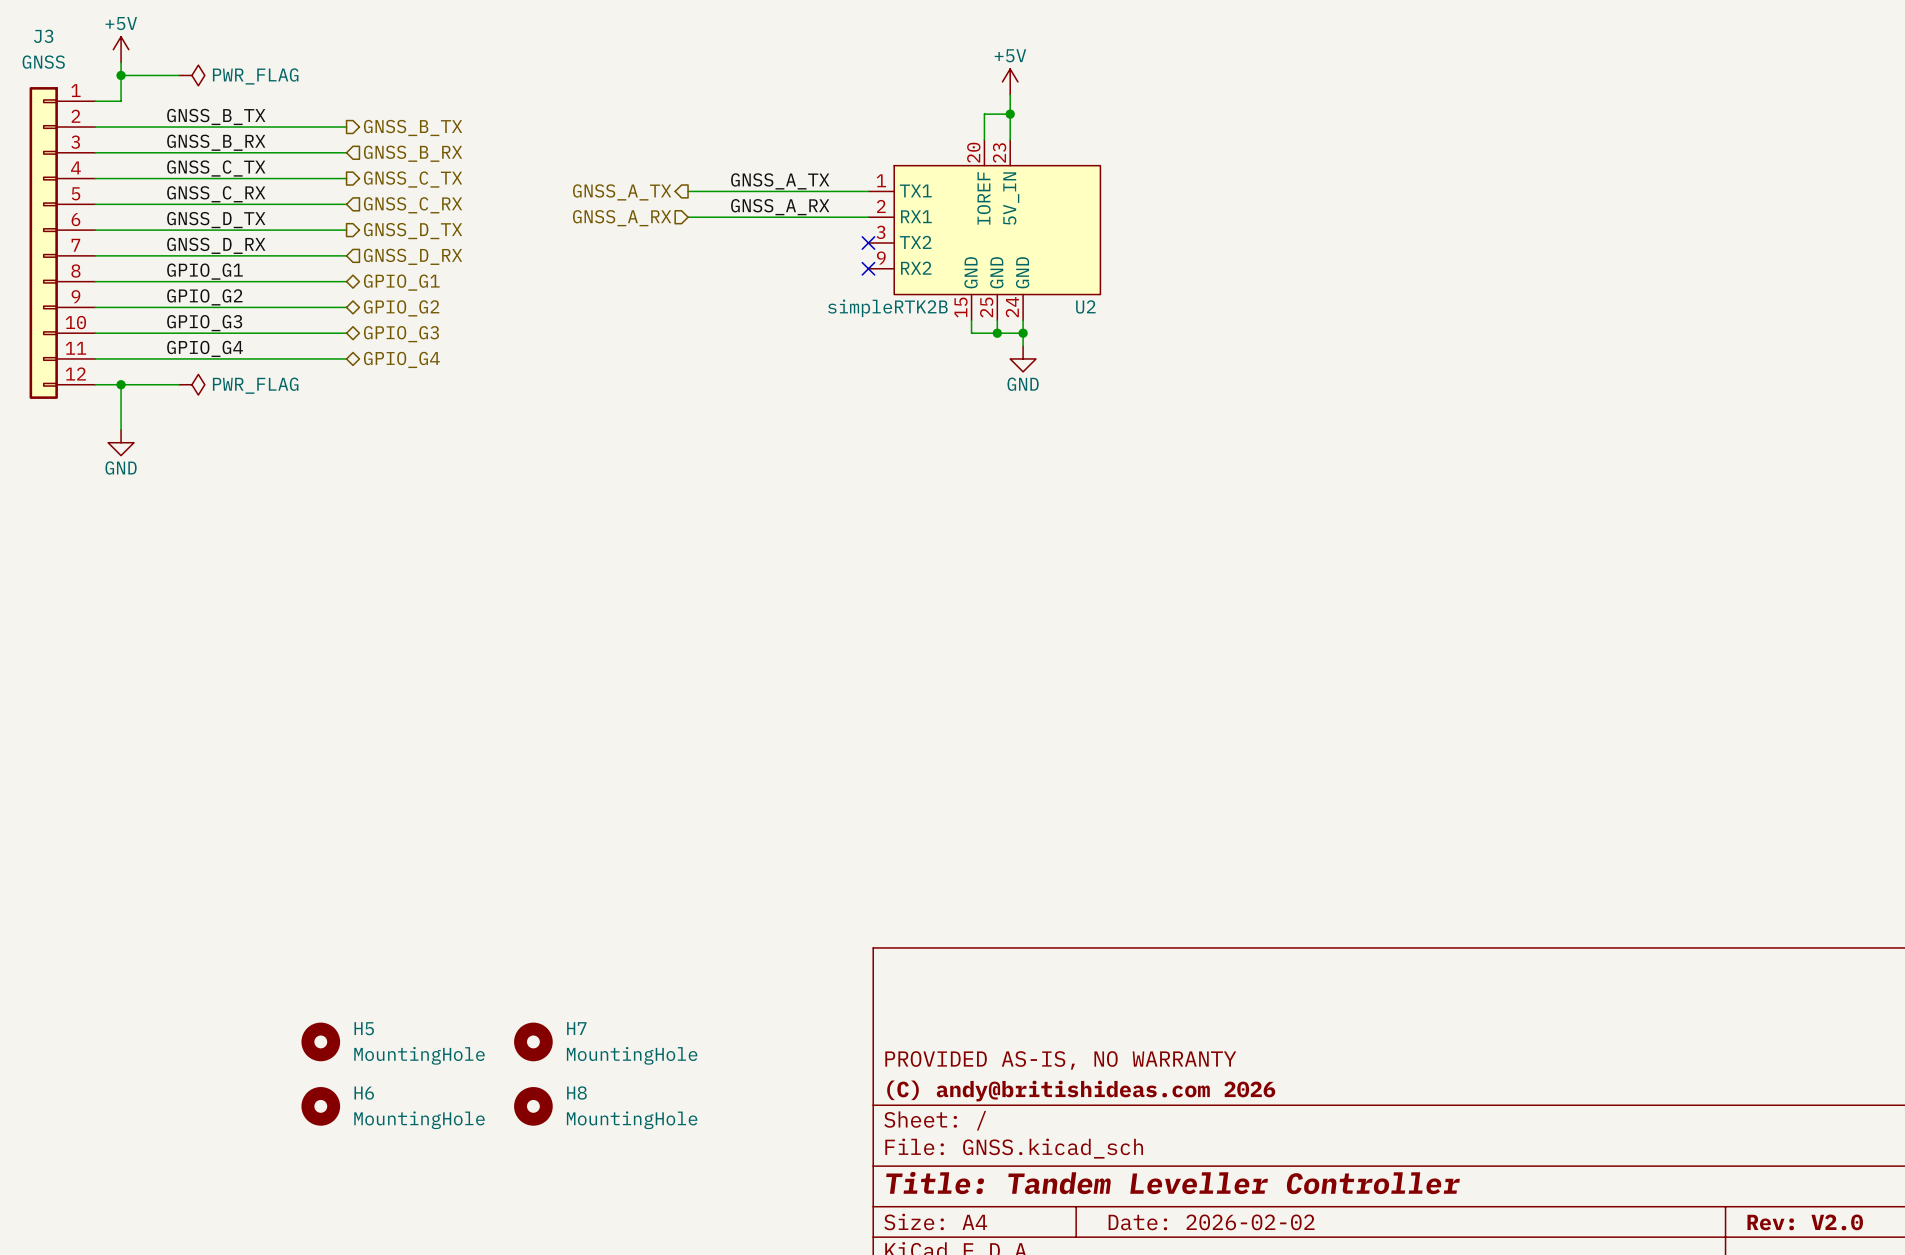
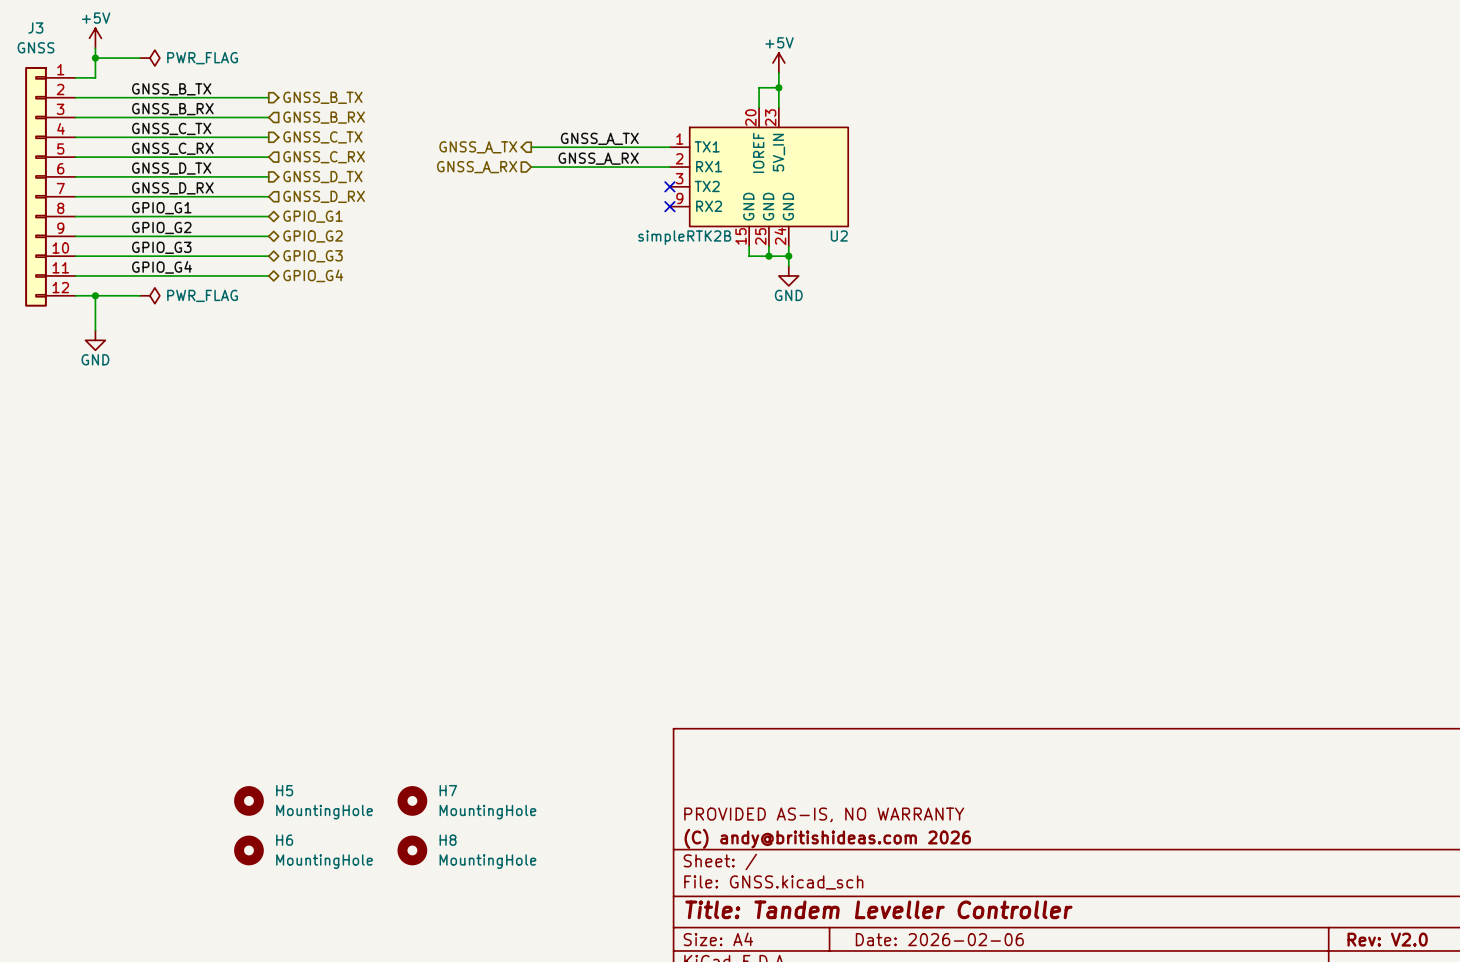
title block: Date: 2026-02-02 (1211, 1222) -> Date: 2026-02-06 (939, 939)

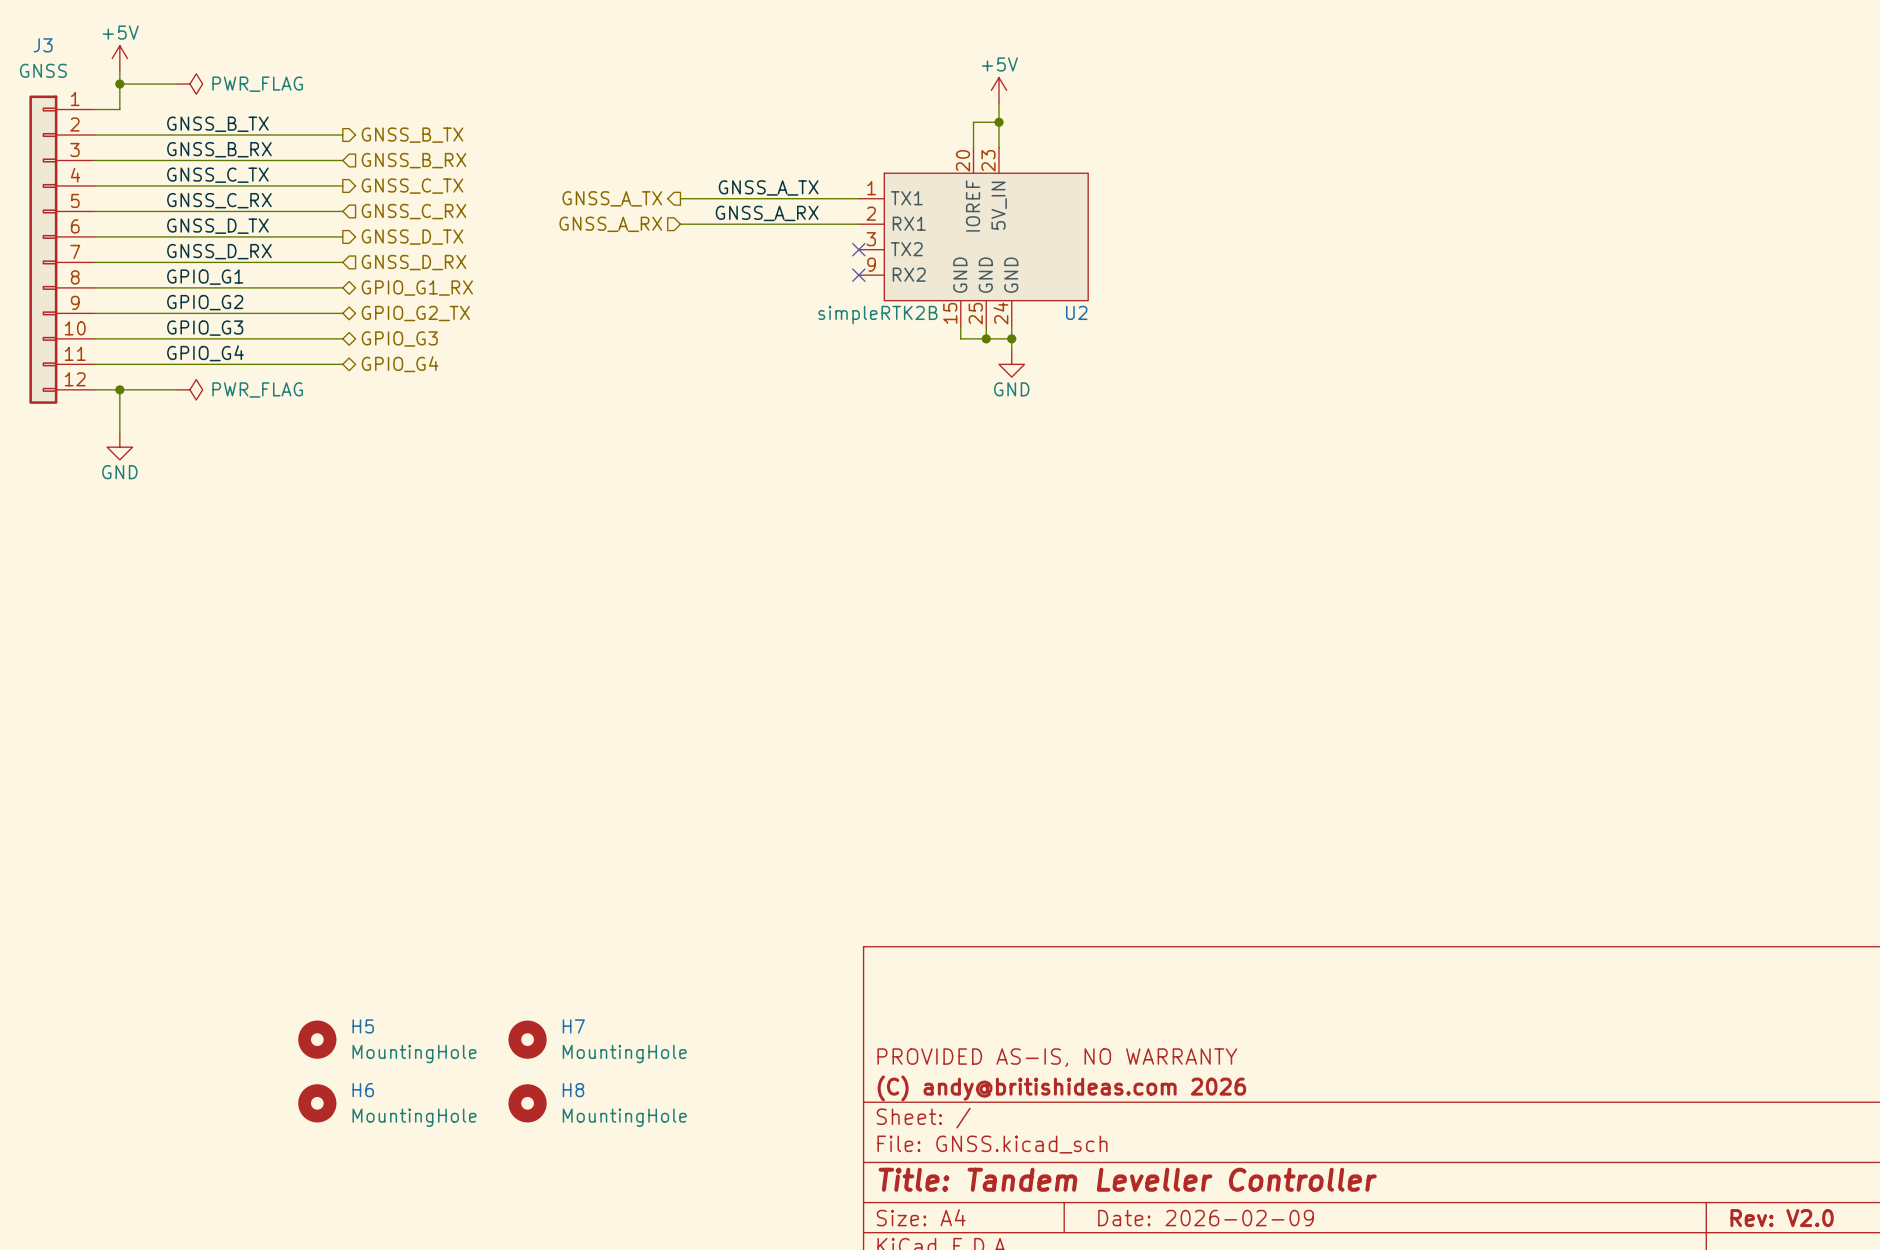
hierarchical label: GPIO_G1 (313, 216) -> GPIO_G1_RX (417, 288)
hierarchical label: GPIO_G2 (313, 236) -> GPIO_G2_TX (415, 313)
title block: Date: 2026-02-06 (939, 939) -> Date: 2026-02-09 (1206, 1218)

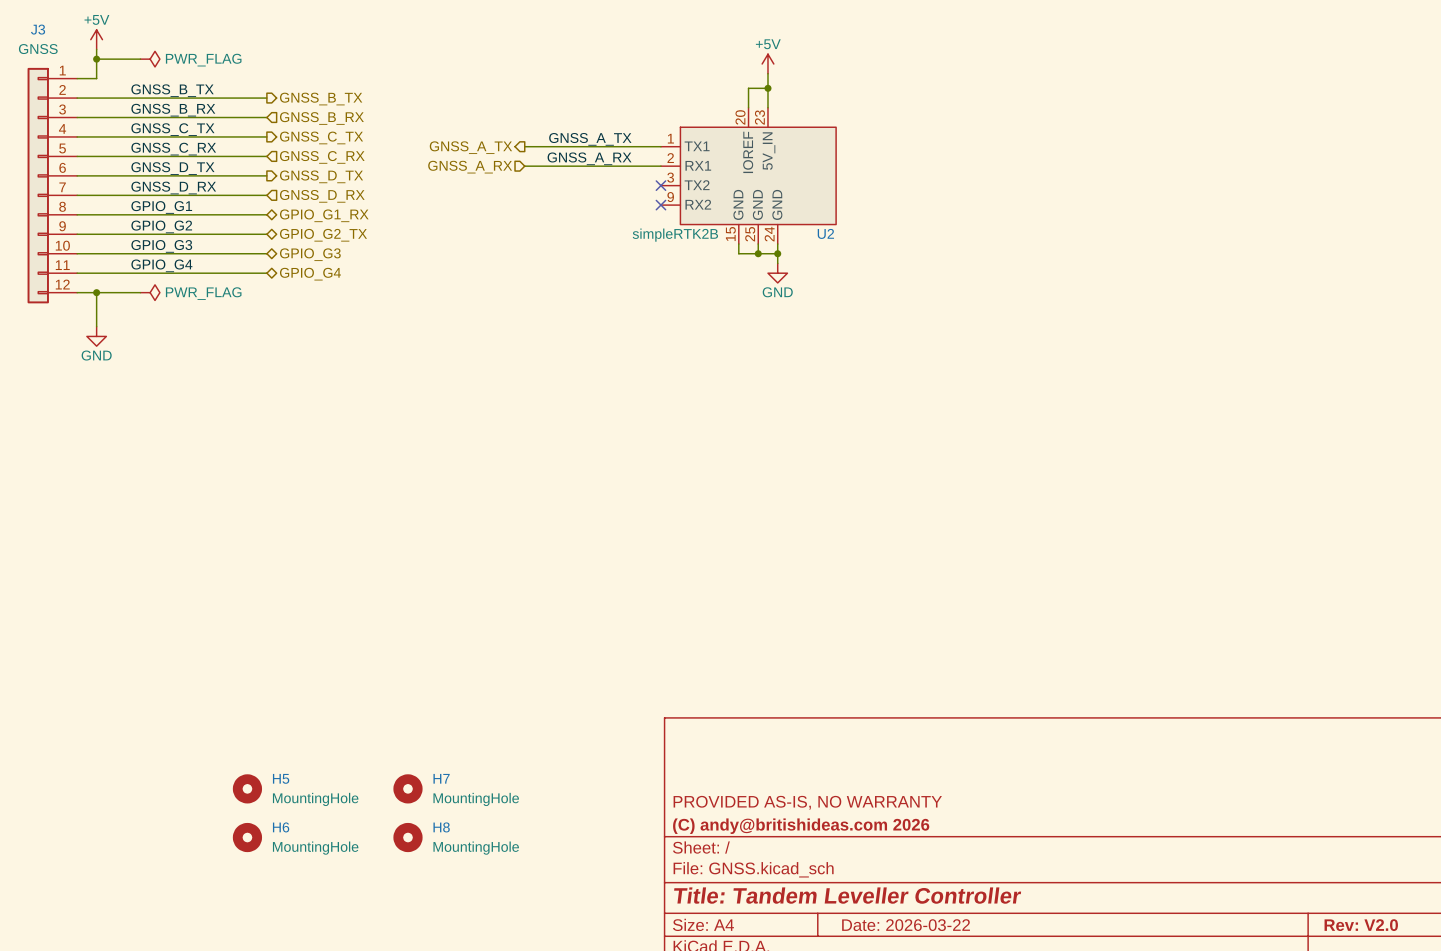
title block: Date: 2026-02-09 (1206, 1218) -> Date: 2026-03-22 (906, 925)

